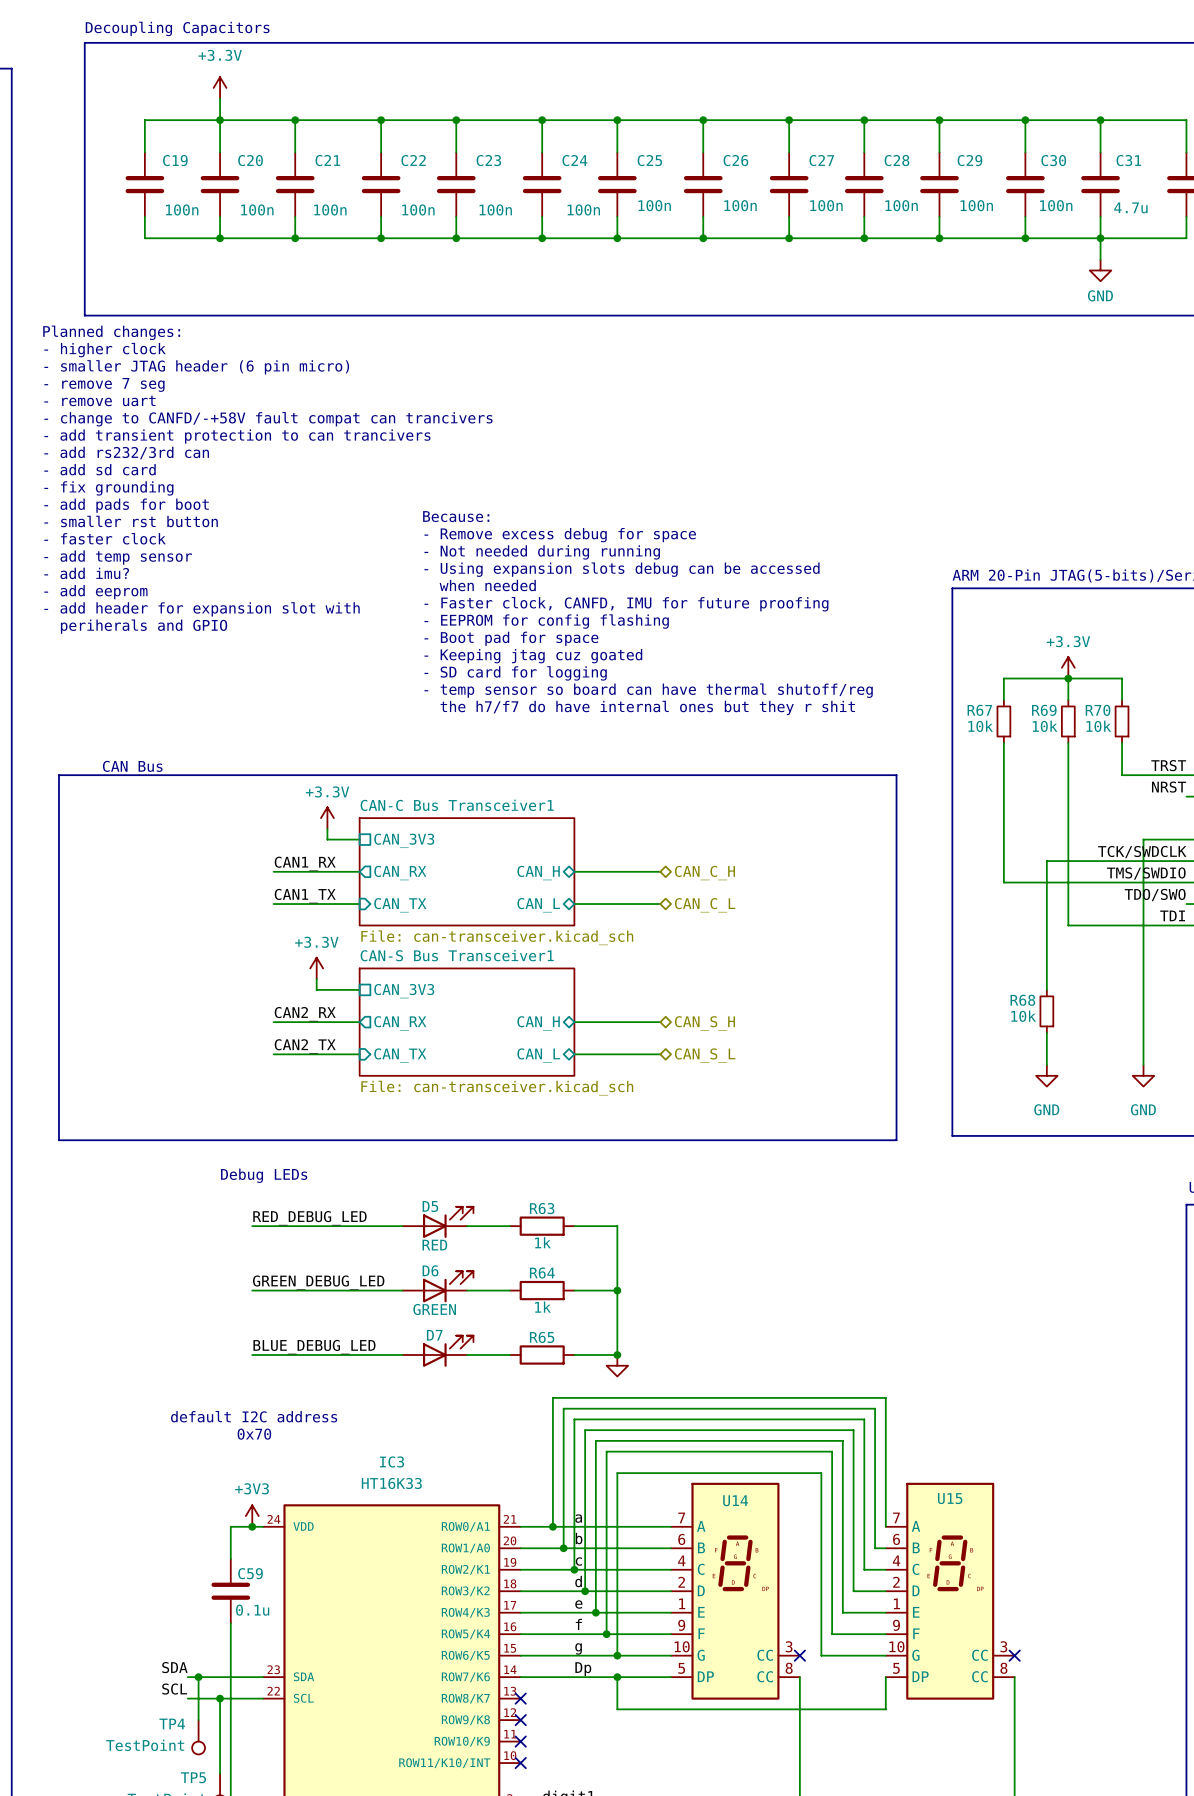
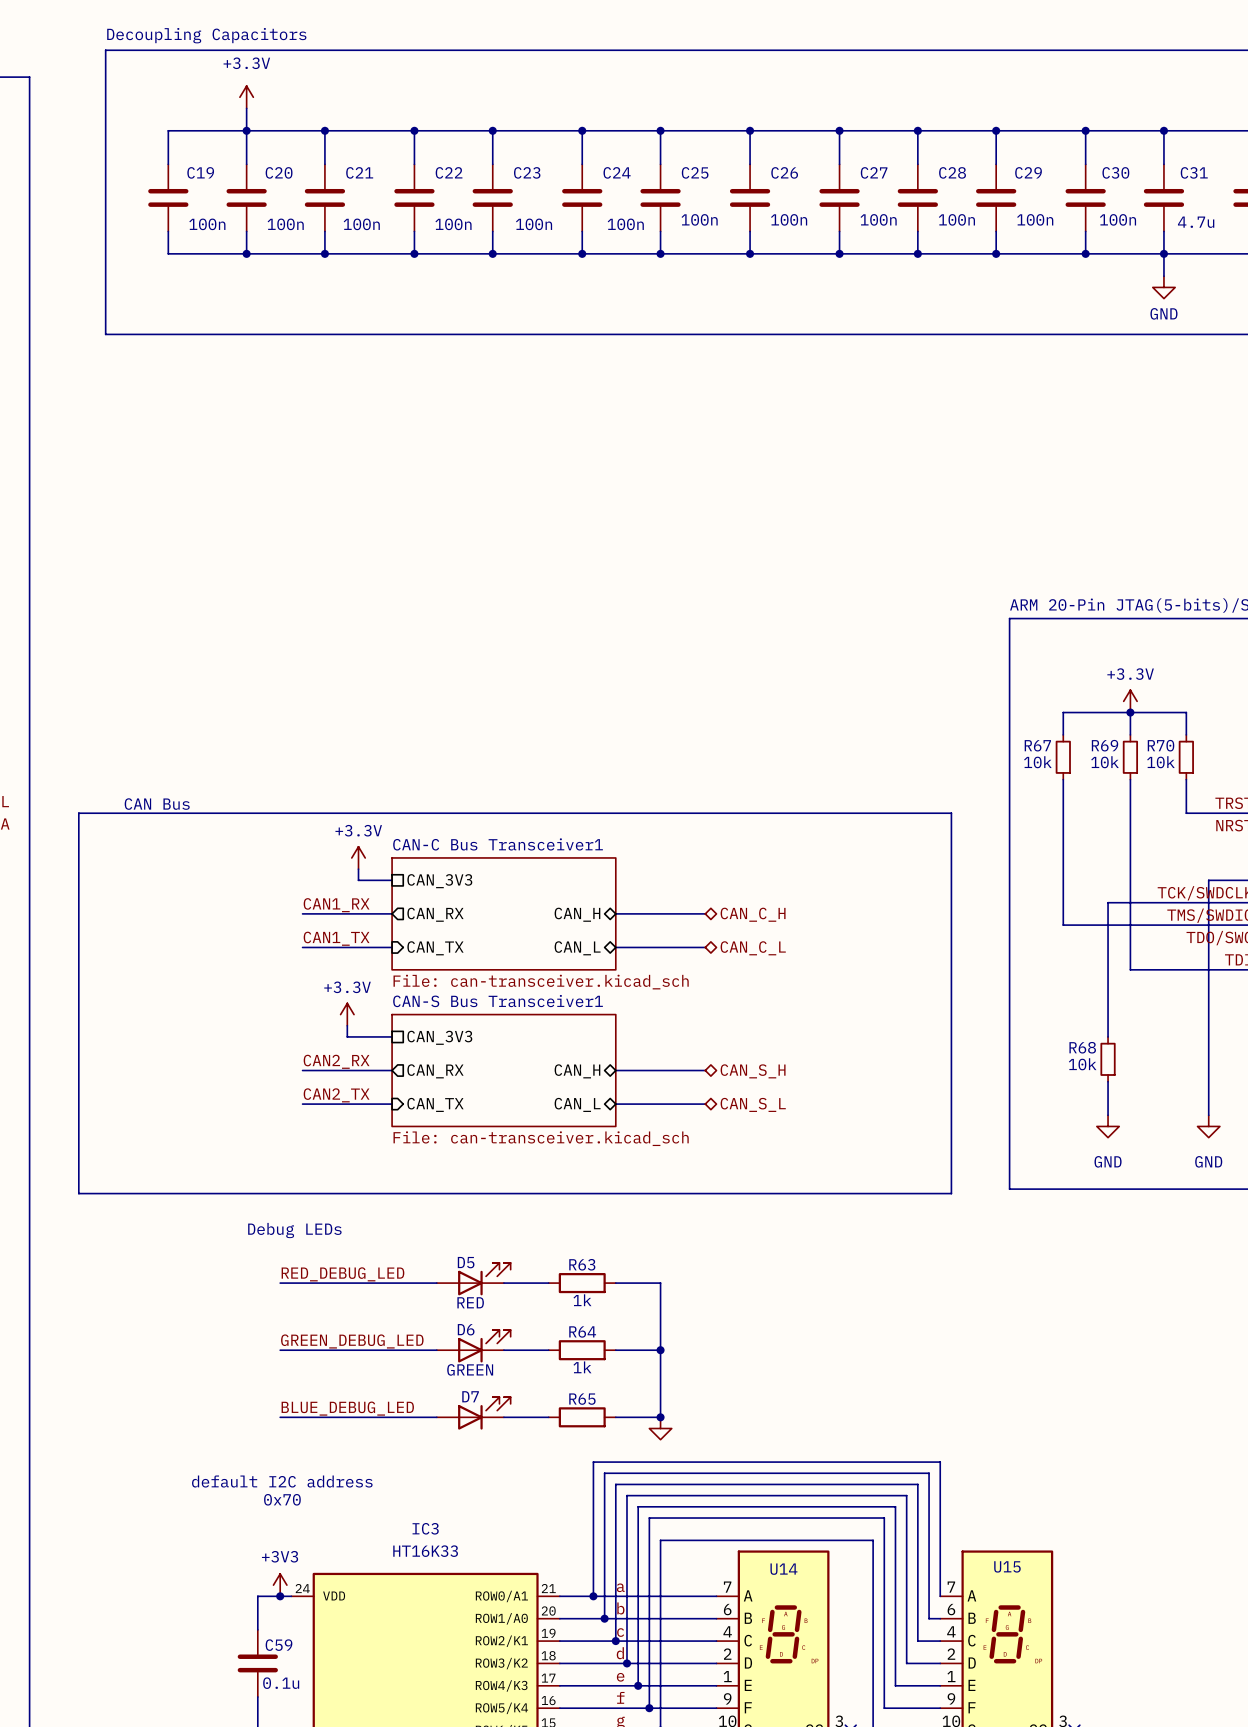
text: Planned changes: (111, 332) -> none
text: - higher clock (105, 350) -> none
text: - smaller JTAG header (6 pin micro) (196, 367) -> none
text: - remove 7 seg (104, 384) -> none
text: - remove uart (100, 400) -> none
text: - change to CANFD/-+58V fault compat can trancivers (268, 419) -> none
text: - add transient protection to can trancivers (237, 436) -> none
text: - add rs232/3rd can (126, 452) -> none
text: - add sd card (100, 469) -> none
text: - fix grounding (108, 488) -> none
text: - add pads for boot (126, 505) -> none
text: Because: (456, 516) -> none
text: - smaller rst button (131, 521) -> none
text: - Remove excess debug for space (560, 535) -> none
text: - faster clock (105, 538) -> none
text: - Not needed during running (542, 552) -> none
text: - add temp sensor (118, 557) -> none
text: - Using expansion slots debug can be accessed (622, 569) -> none
text: - add imu? (86, 573) -> none
text: when needed (487, 585) -> none
text: - add eeprom (95, 592) -> none
text: - Faster clock, CANFD, IMU for future proofing (626, 604) -> none
text: - add header for expansion slot with (202, 609) -> none
text: - EEPROM for config flashing (546, 621) -> none
text: periherals and GPIO (144, 626) -> none
text: - Boot pad for space (511, 638) -> none
text: - Keeping jtag cuz goated (533, 656) -> none
text: - SD card for logging (515, 673) -> none
text: - temp sensor so board can have thermal shutoff/reg (648, 690) -> none
text: the h7/f7 do have internal ones but they r shit (647, 707) -> none

